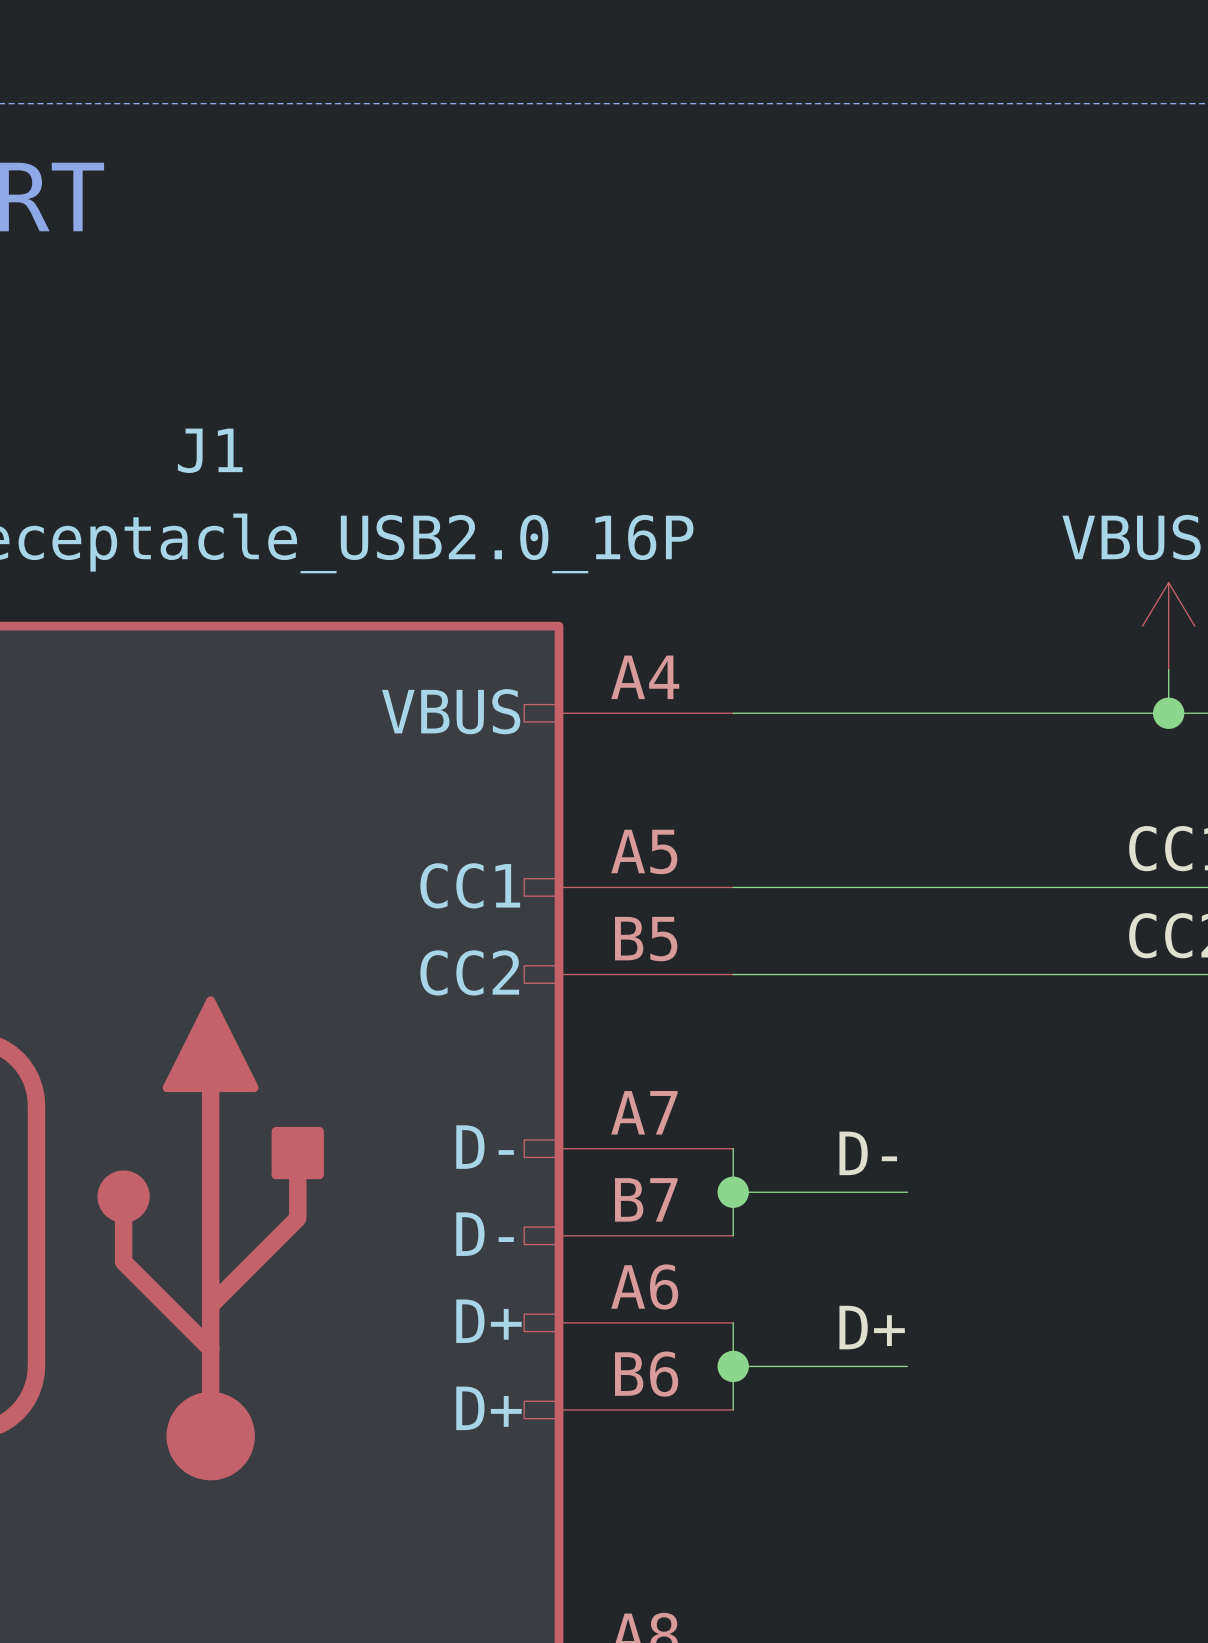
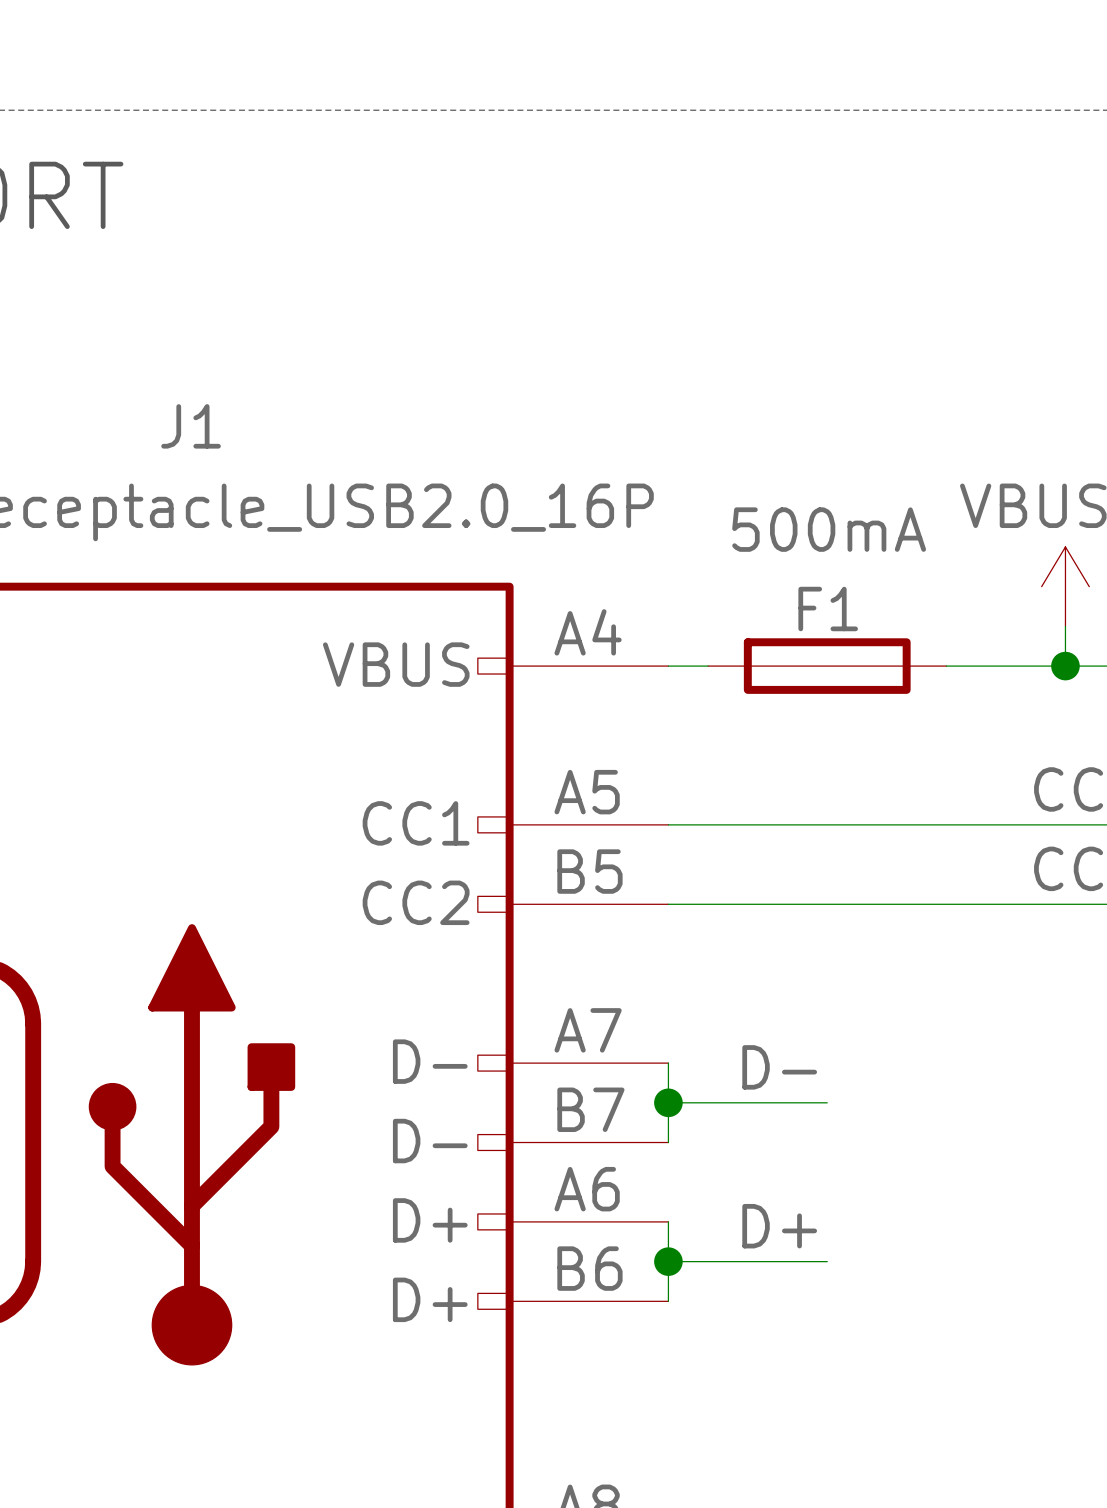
F1: none -> 500mA (827, 666)

